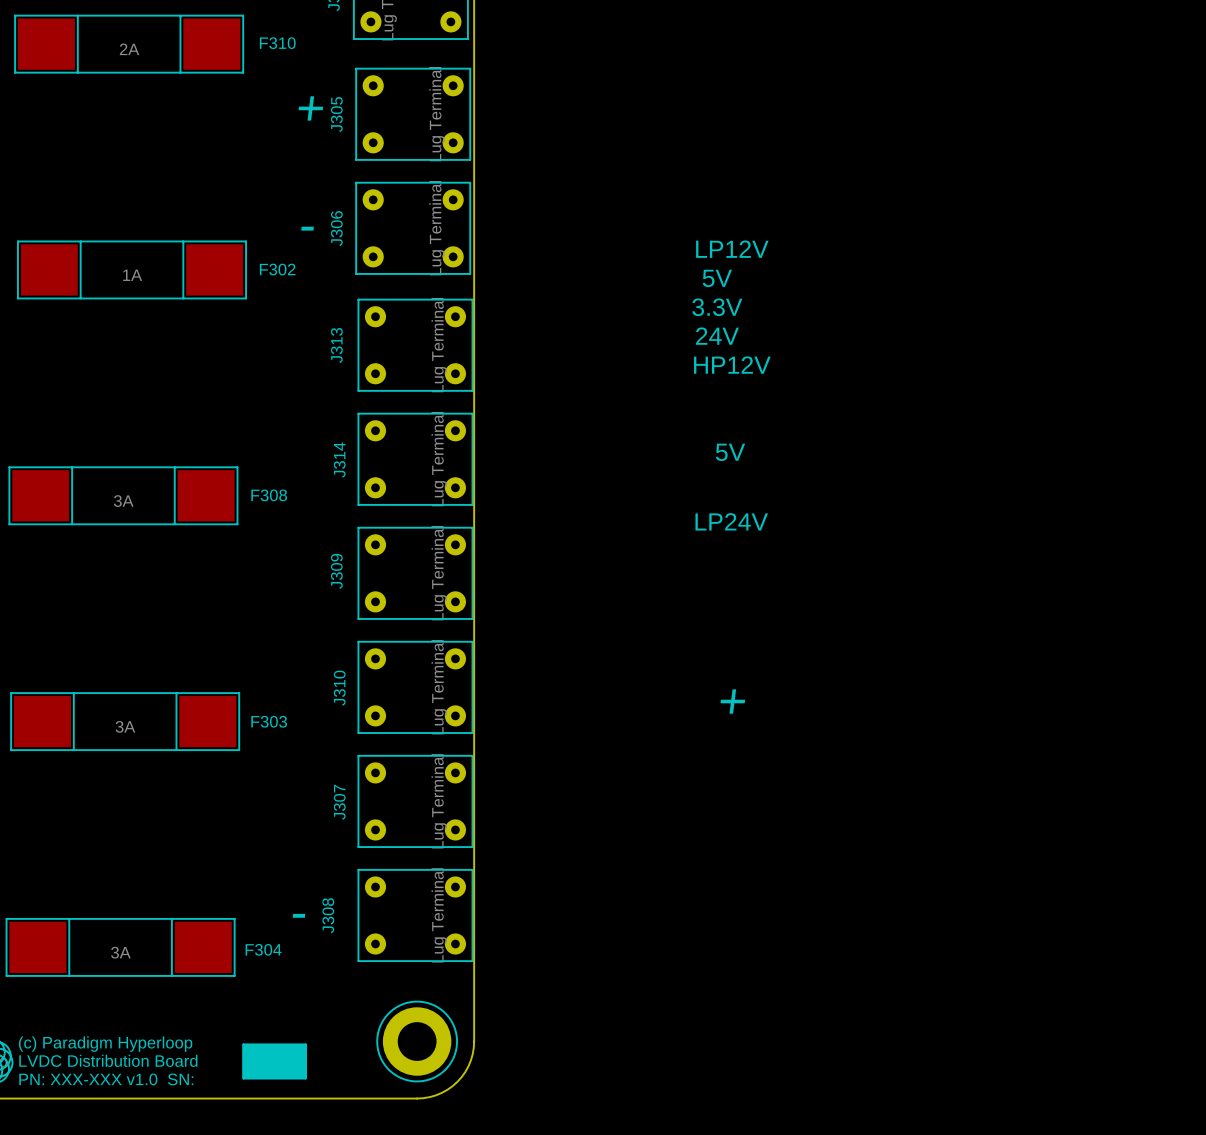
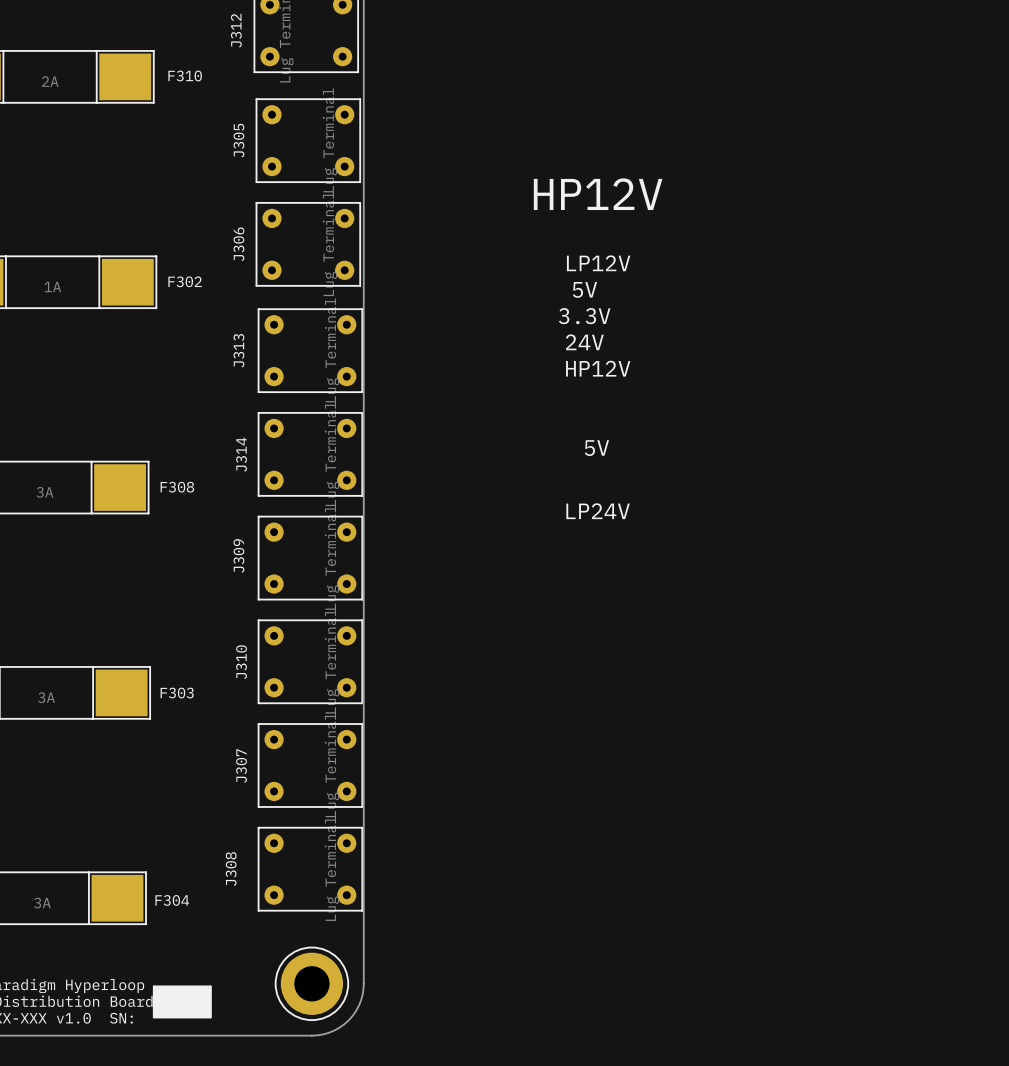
text: + (310, 108) -> none
text: none -> HP12V (598, 194)
text: - (307, 228) -> none
text: + (732, 701) -> none
text: - (299, 915) -> none

